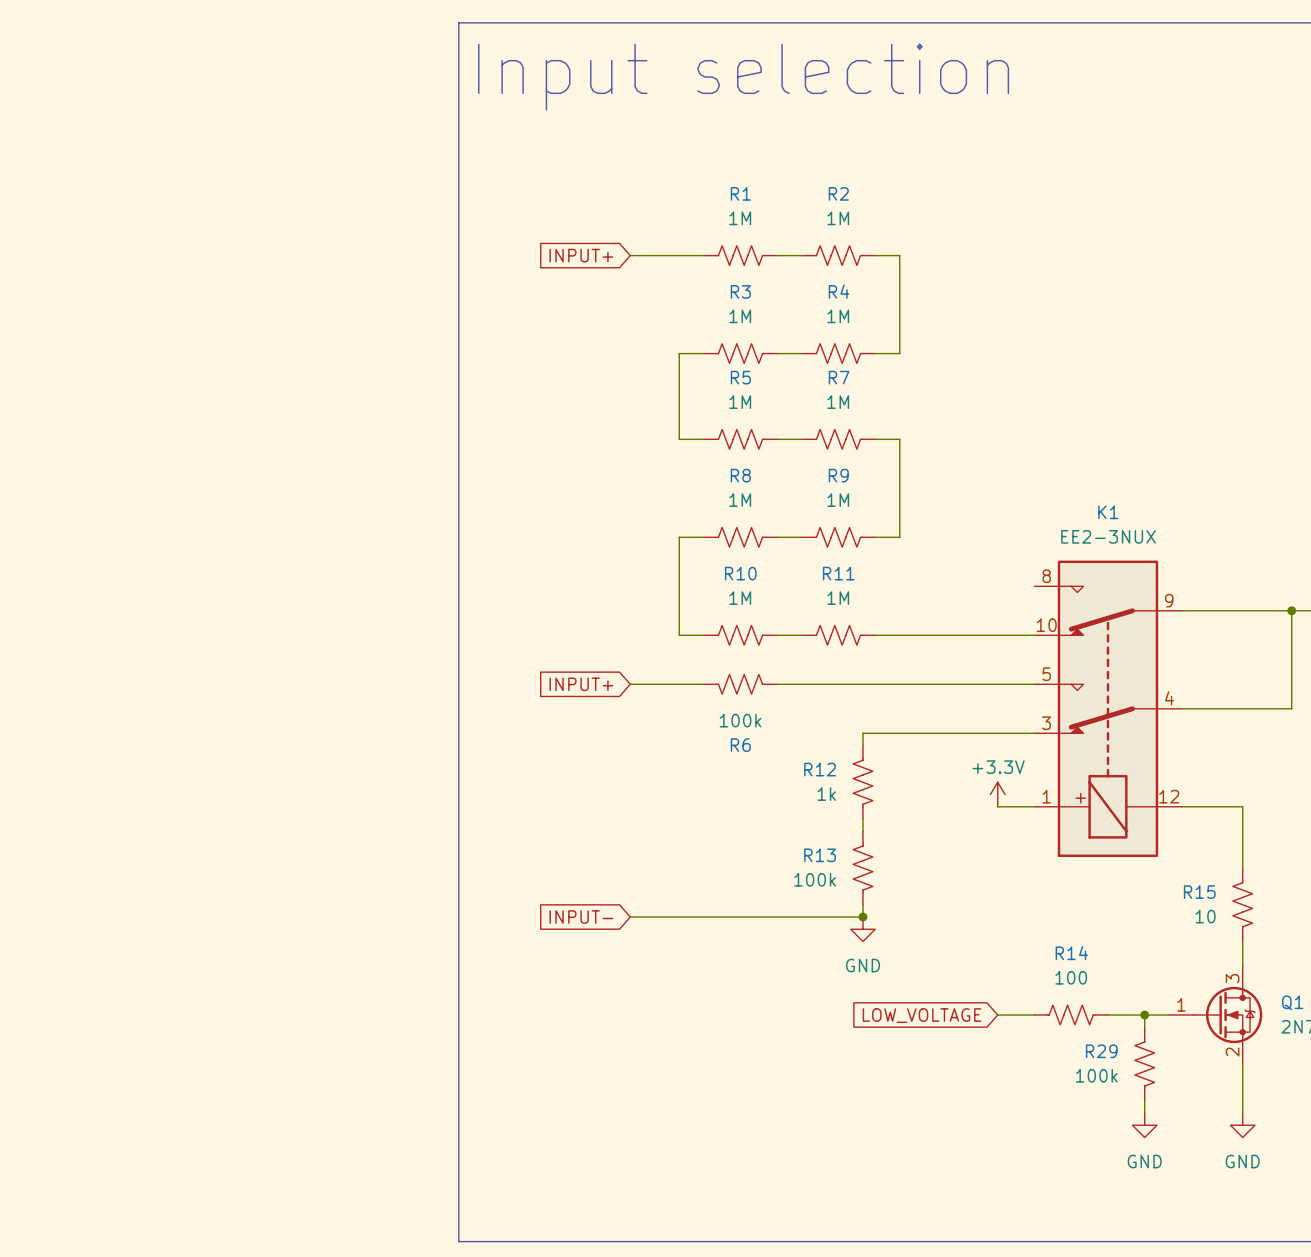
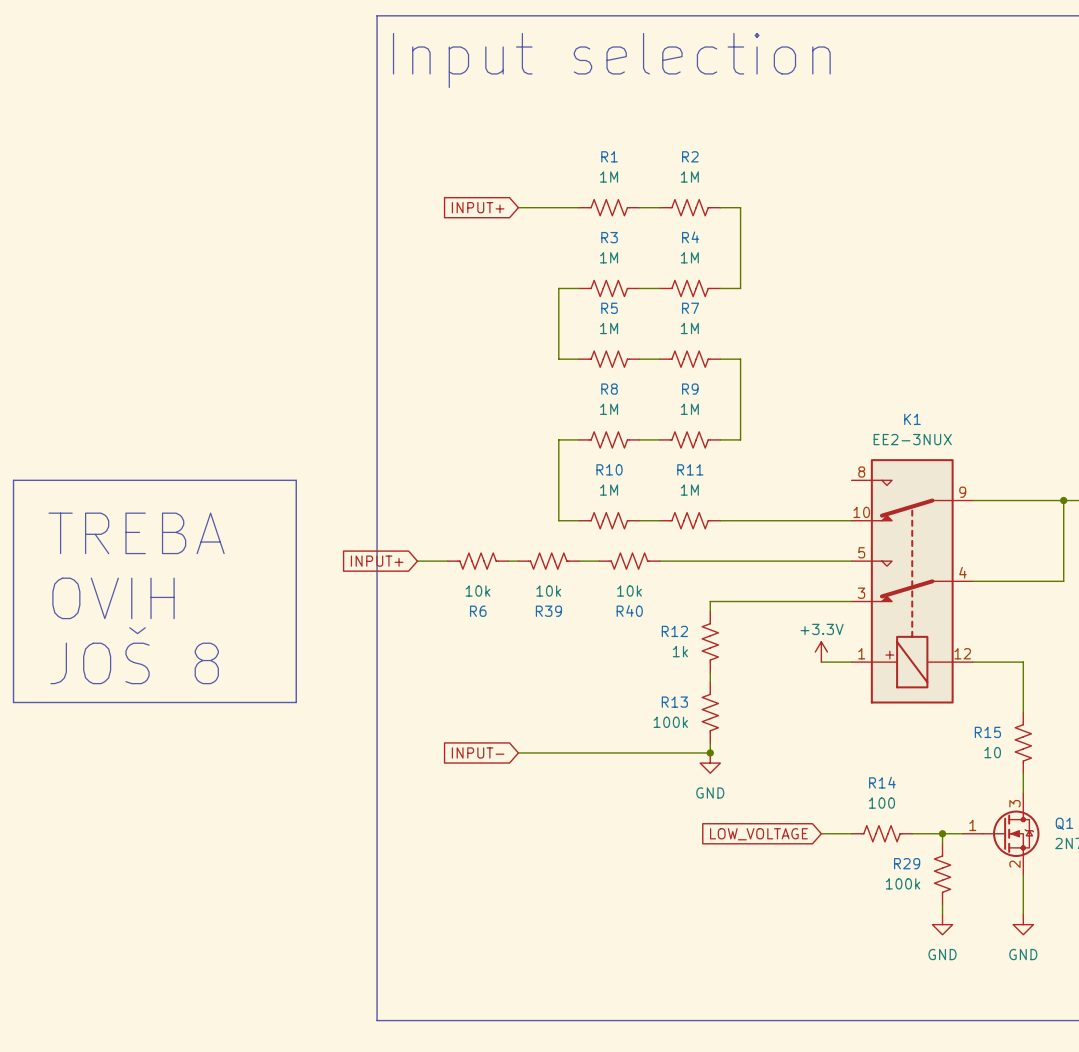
line: none -> (13, 480) (296, 480) (296, 702) (13, 702) (13, 480)
text: none -> TREBA (136, 533)
wire: none -> (417, 561) (447, 561)
global label position: INPUT+ (581, 684) -> INPUT+ (377, 561)
R39: none -> 10k (548, 561)
R6 position: (740, 684) -> (478, 561)
R40: none -> 10k (629, 561)
R6 value: 100k (740, 720) -> 10k (478, 591)
text: none -> OVIH (113, 598)
text: none -> JOŠ 8 (134, 655)

